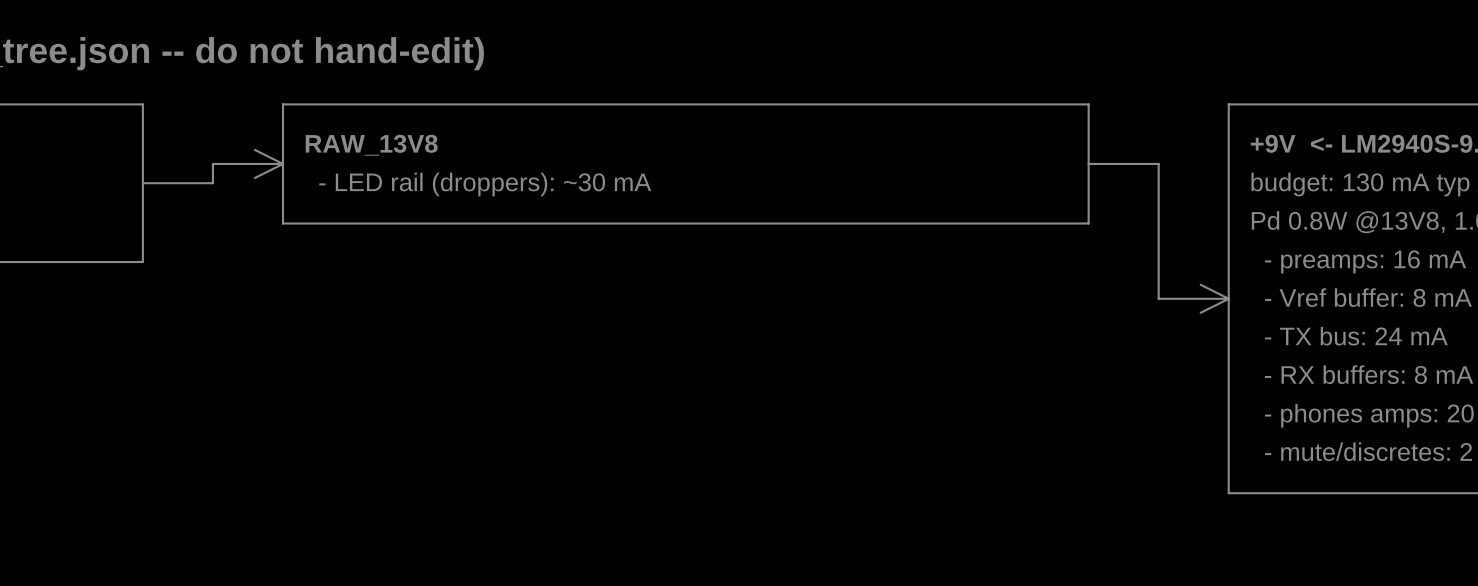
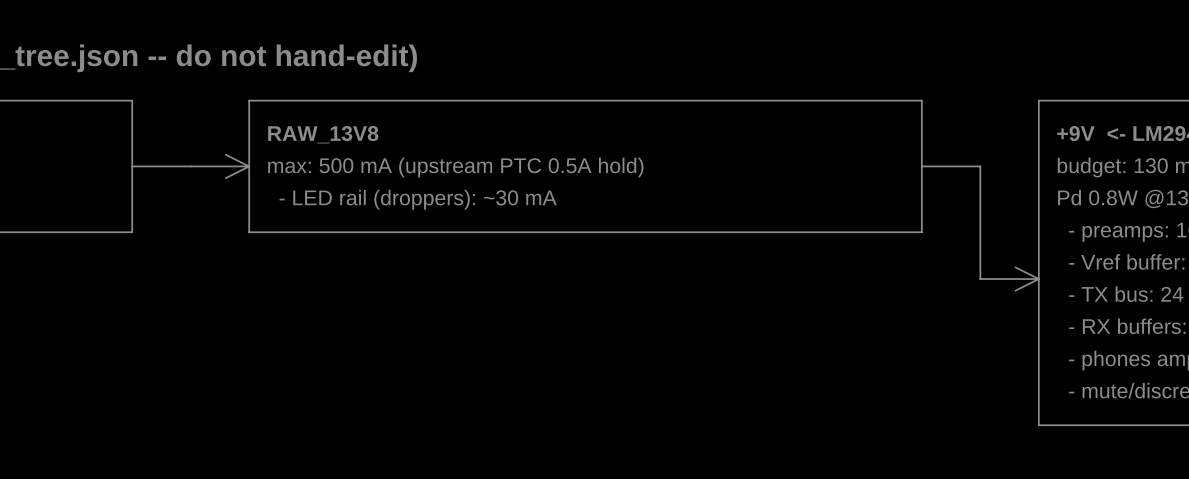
line: (254, 149) (283, 163) -> (225, 154) (249, 166)
line: (283, 163) (212, 163) (212, 183) -> (249, 166) (190, 166)
line: (283, 163) (254, 177) -> (249, 166) (225, 178)
line: (1088, 163) (1158, 163) (1158, 183) -> (921, 166) (980, 166)
text: - LED rail (droppers): ~30 mA (485, 184) -> max: 500 mA (upstream PTC 0.5A hold) (455, 167)
line: (283, 223) (1088, 223) -> (249, 200) (249, 232) (921, 232) (921, 200)
text: none -> - LED rail (droppers): ~30 mA (418, 199)
line: (1200, 284) (1228, 298) -> (1015, 267) (1038, 279)
line: (1158, 298) (1228, 298) -> (980, 262) (980, 279) (1038, 279)
line: (1228, 298) (1200, 312) -> (1038, 279) (1015, 290)

